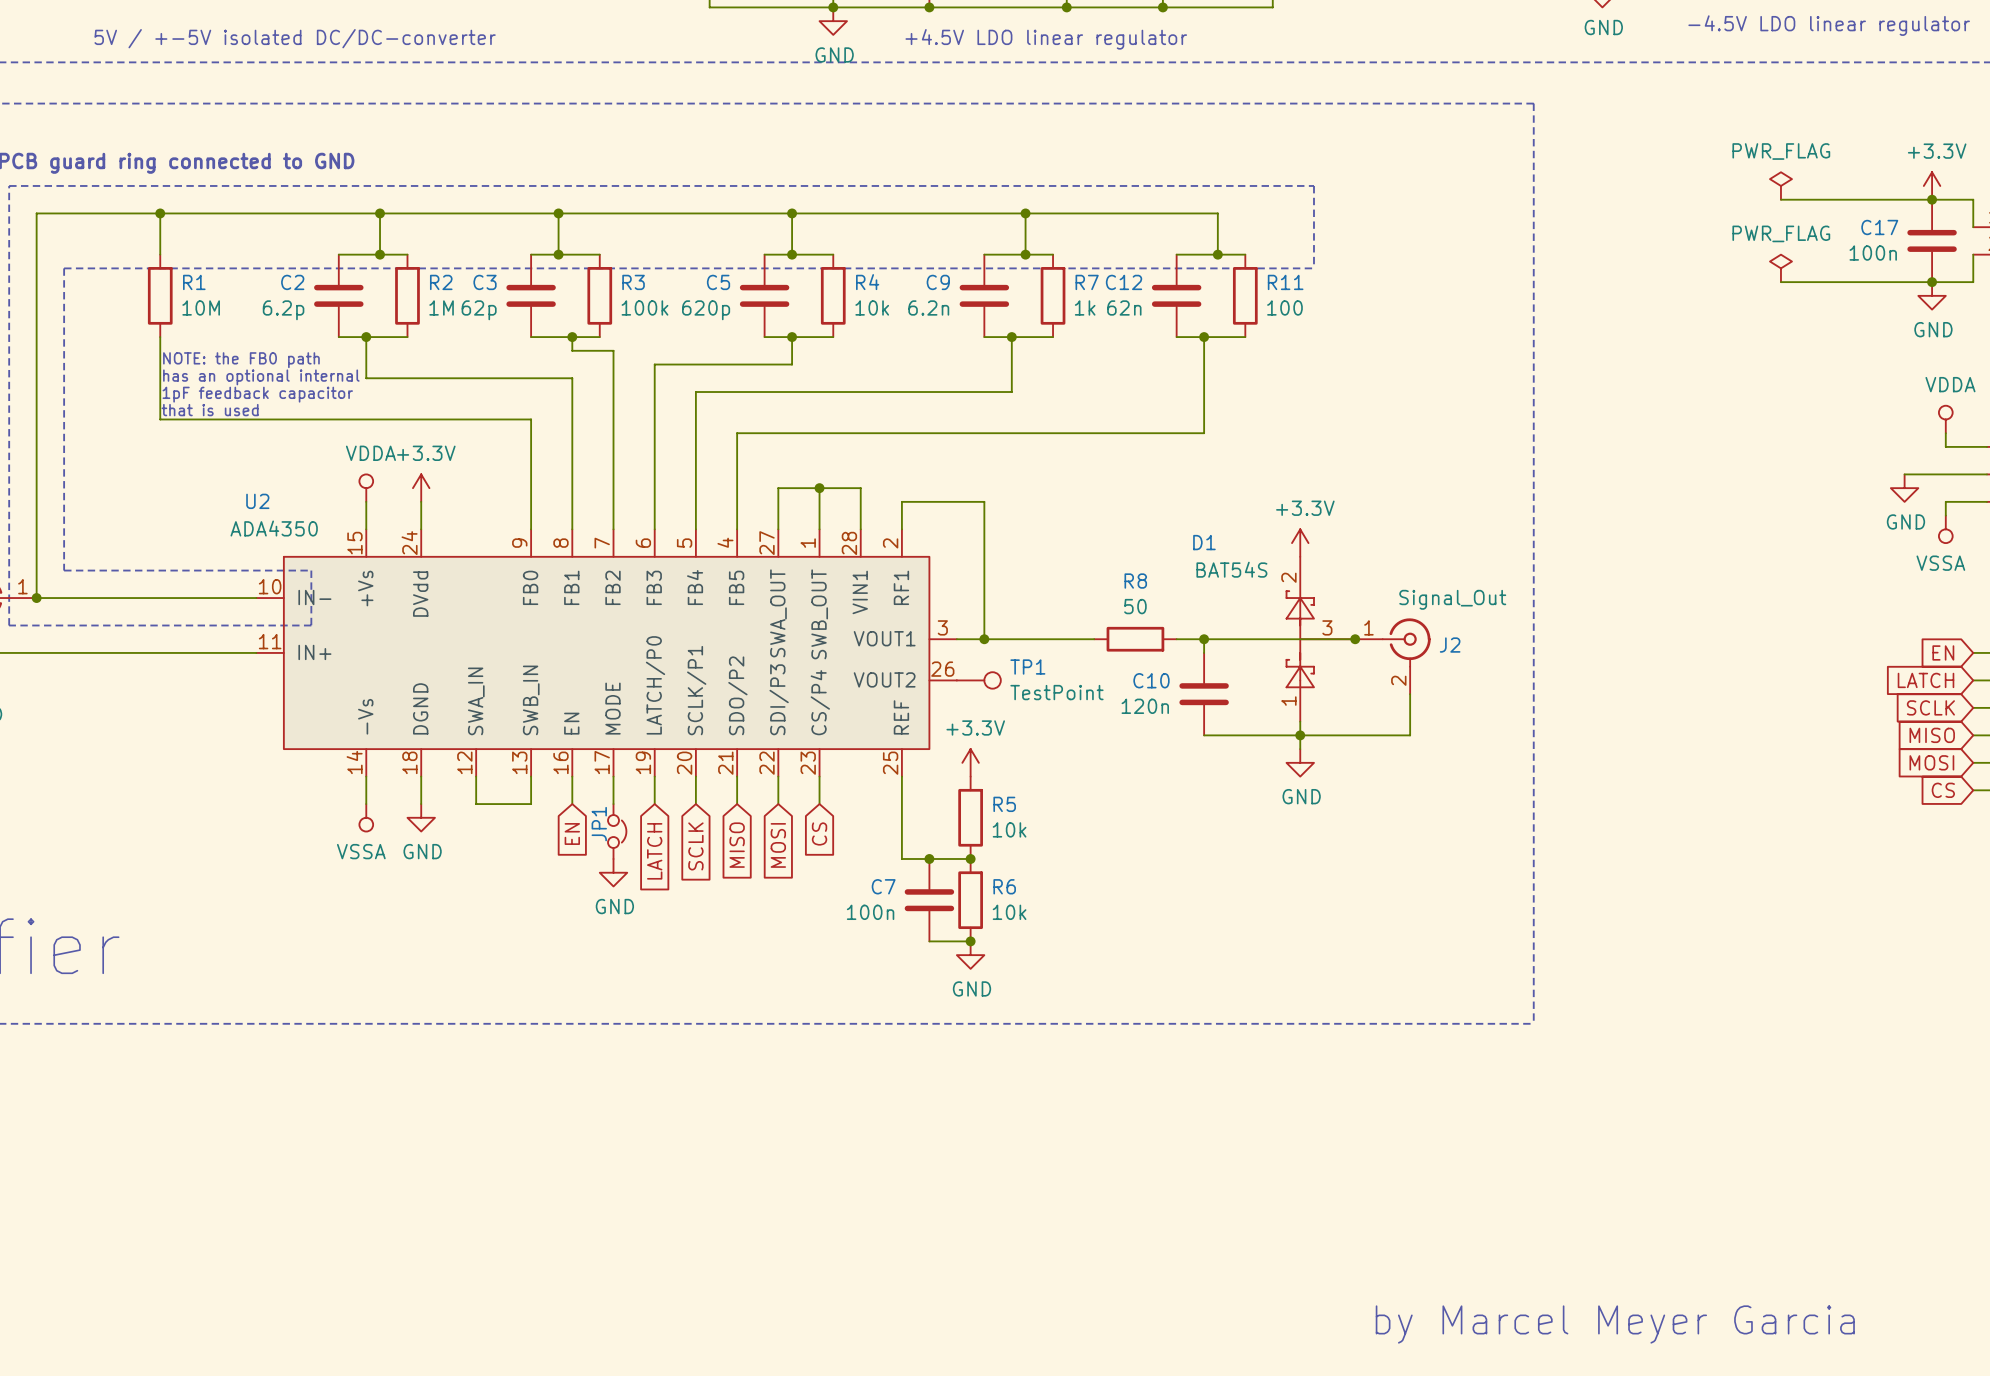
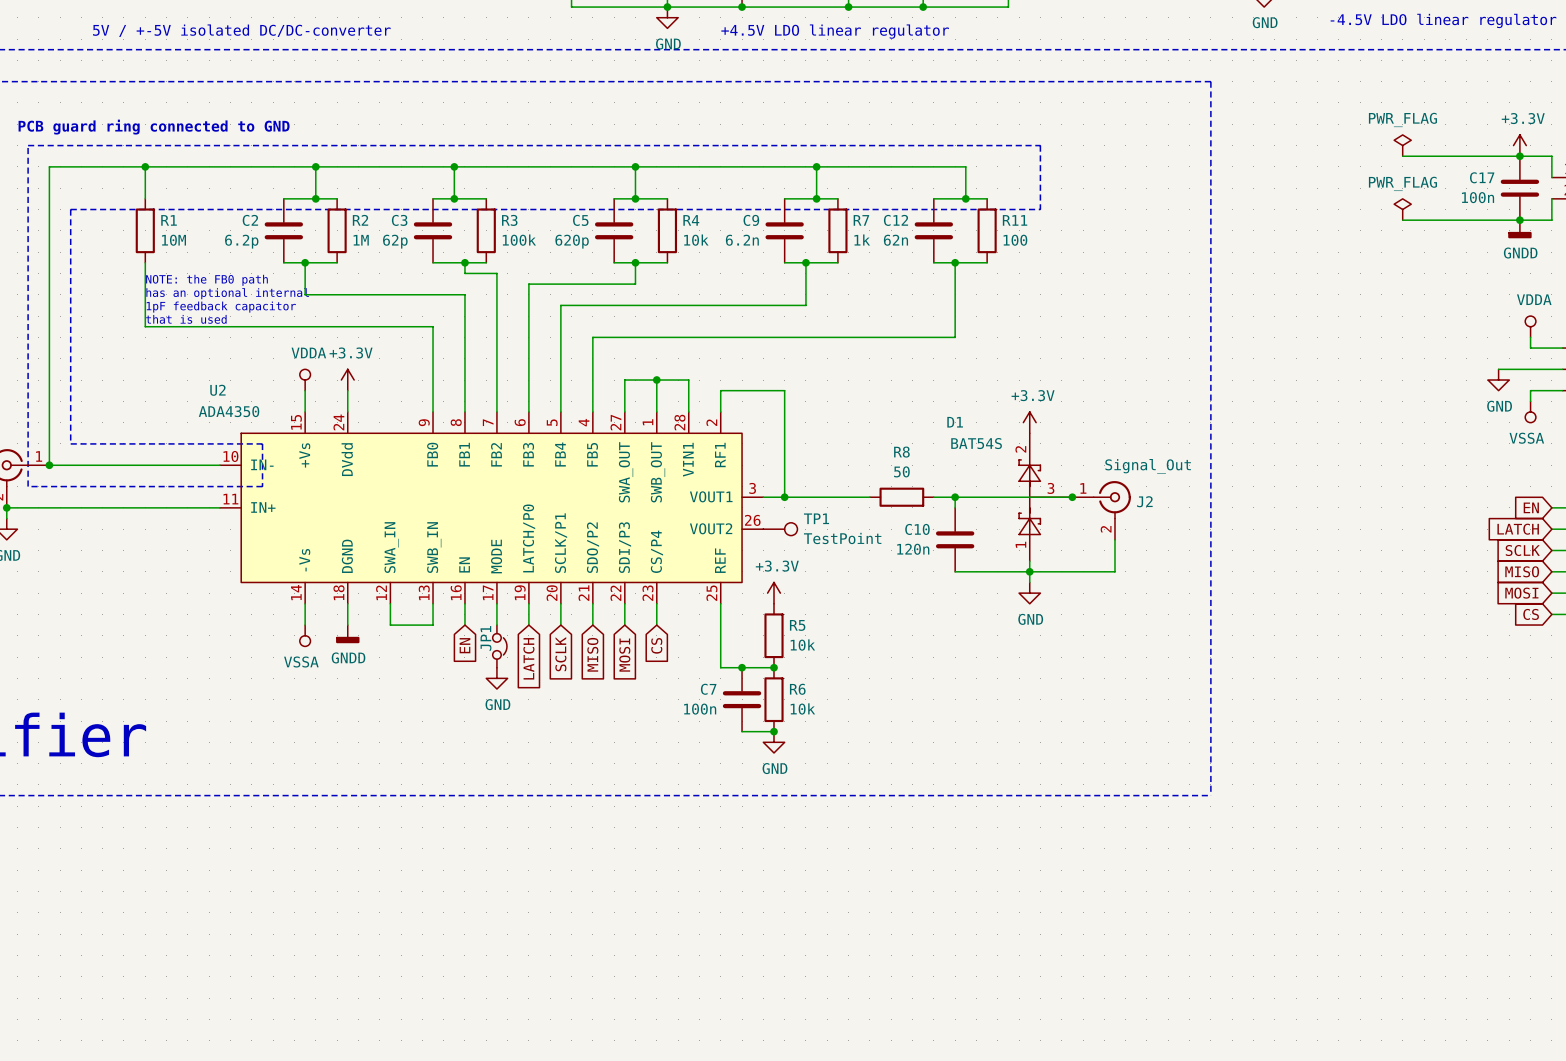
power symbol: GND (1932, 295) -> GNDD (1519, 229)
power symbol: GND (421, 817) -> GNDD (347, 634)
text: by Marcel Meyer Garcia (1615, 1324) -> none

